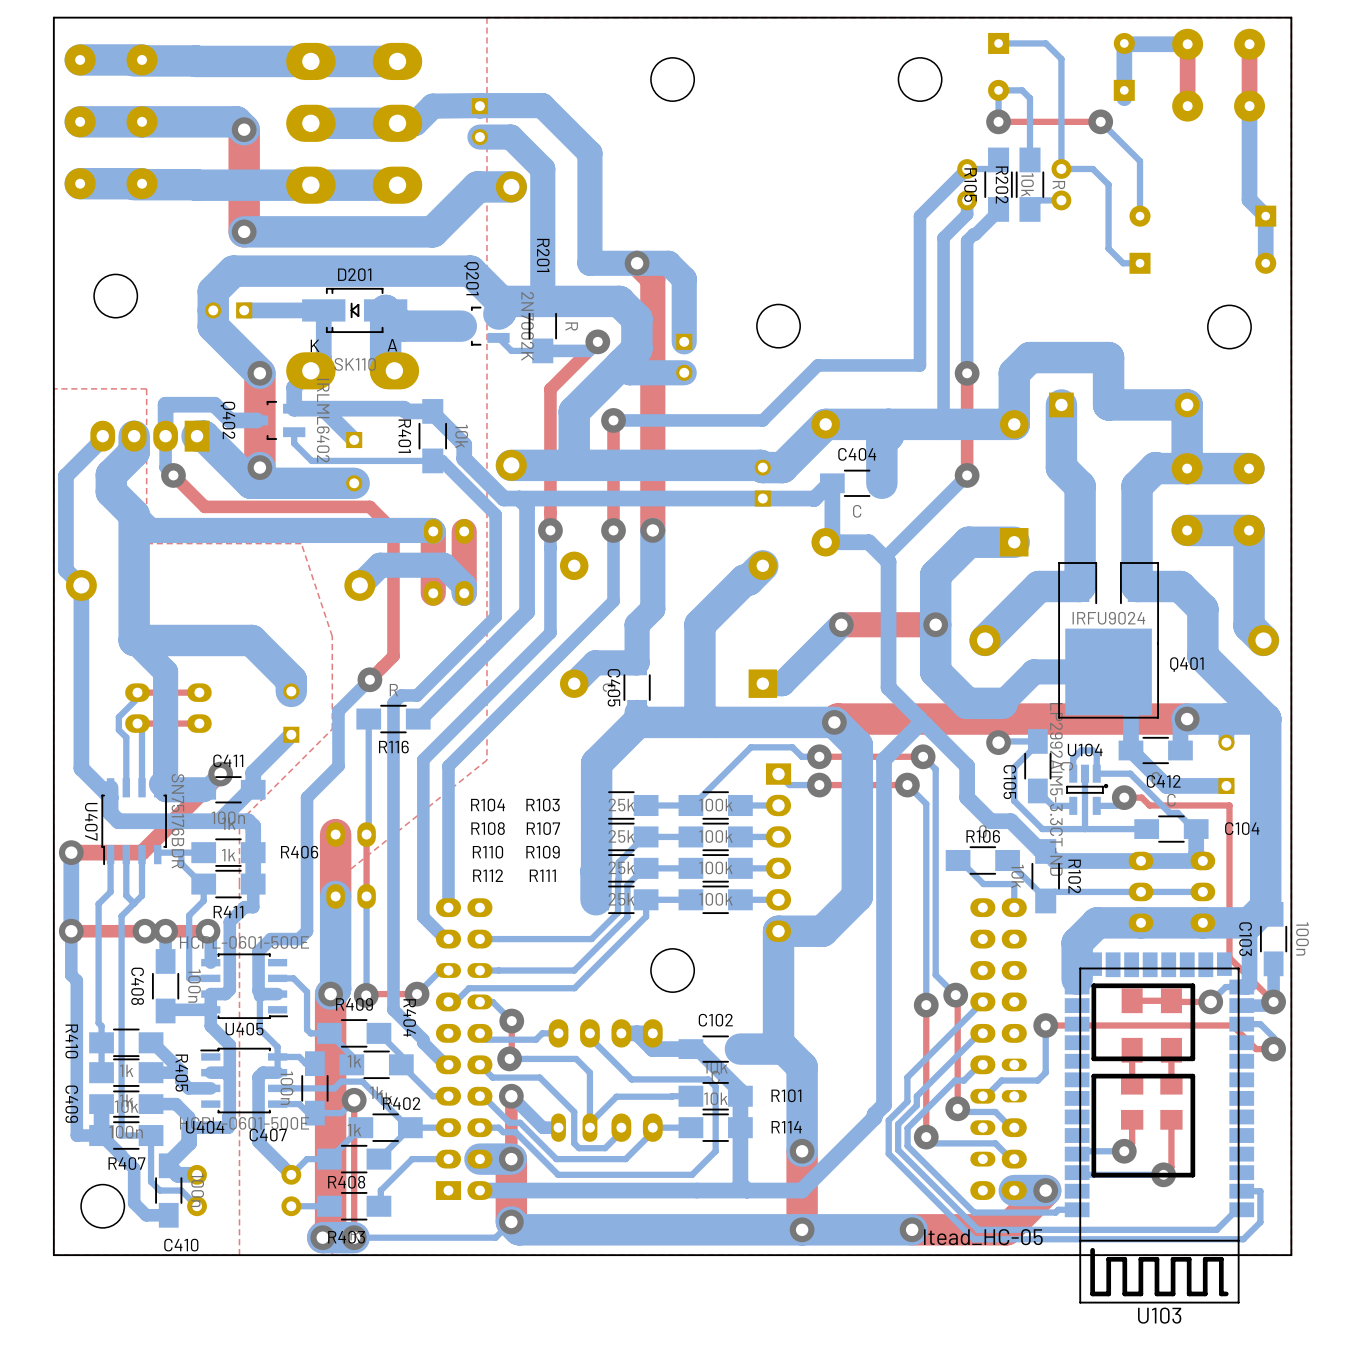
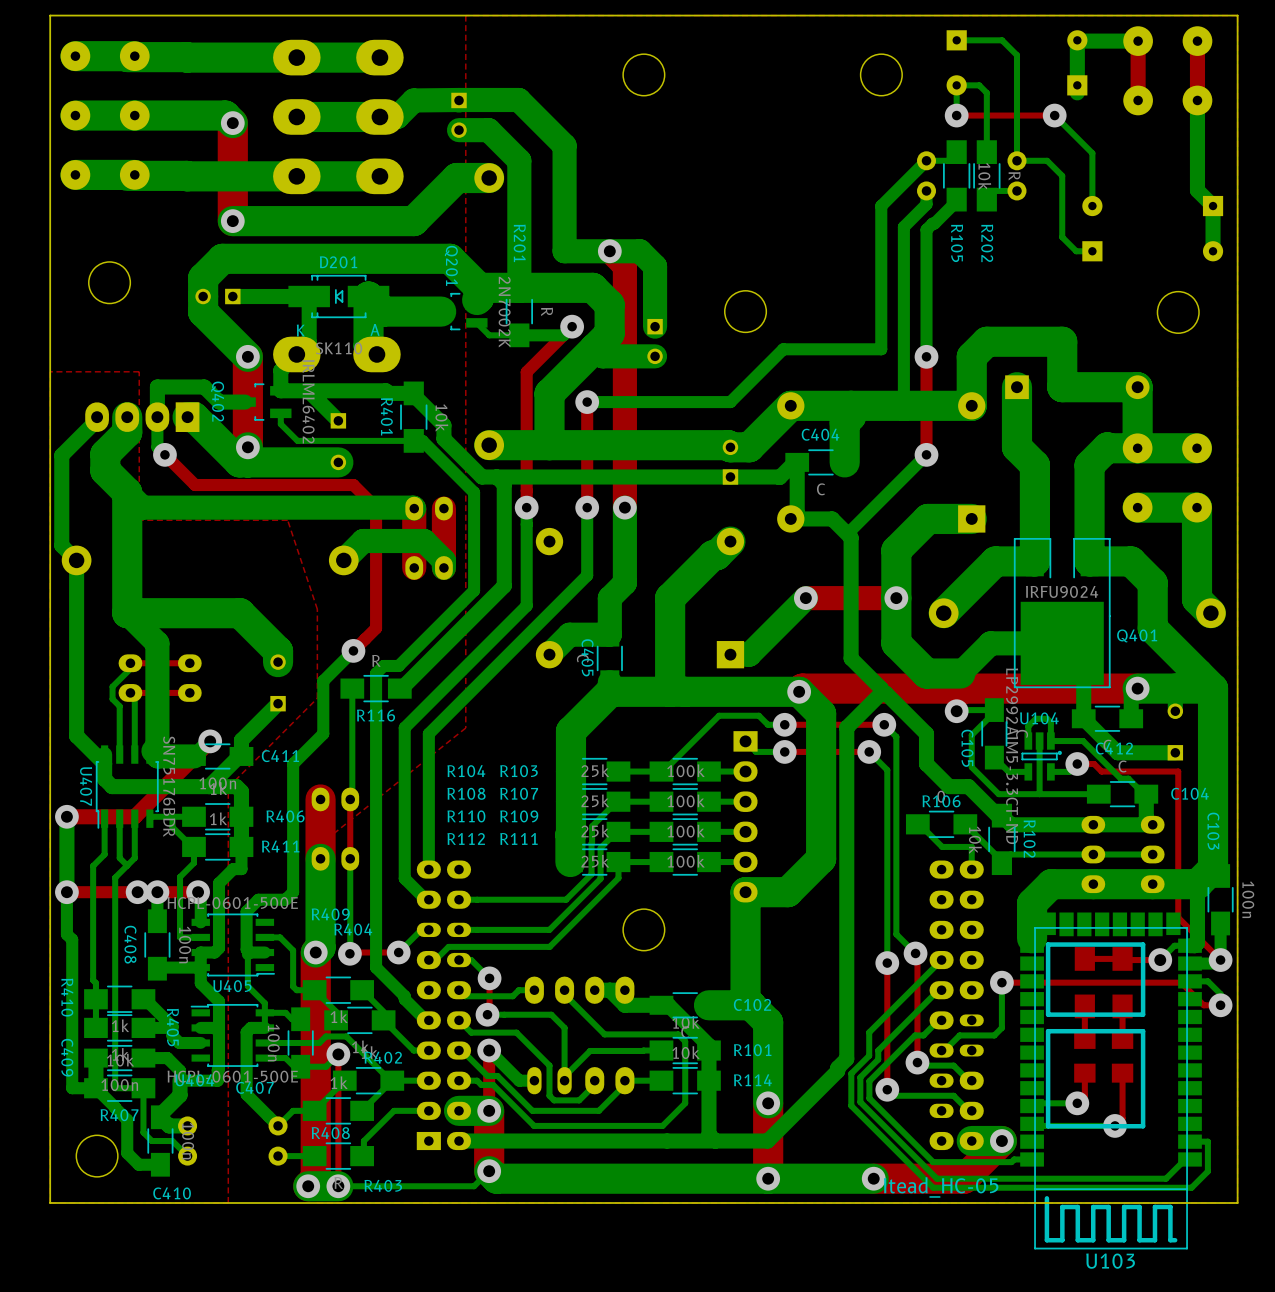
R105 name position: R105 (970, 185) -> R105 (957, 243)
R202 name position: R202 (1001, 185) -> R202 (987, 243)
C411 name position: C411 (228, 760) -> C411 (280, 756)
R411 name position: R411 (228, 912) -> R411 (280, 846)
C103 name position: C103 (1245, 939) -> C103 (1213, 831)
R409 name position: R409 (354, 1004) -> R409 (330, 914)
R404 name rotation: 0° (409, 1017) -> 90° counterclockwise (353, 929)
R404 name position: R404 (409, 1017) -> R404 (353, 929)
C102 name position: C102 (715, 1020) -> C102 (752, 1004)
R403 name position: R403 (346, 1237) -> R403 (383, 1185)

